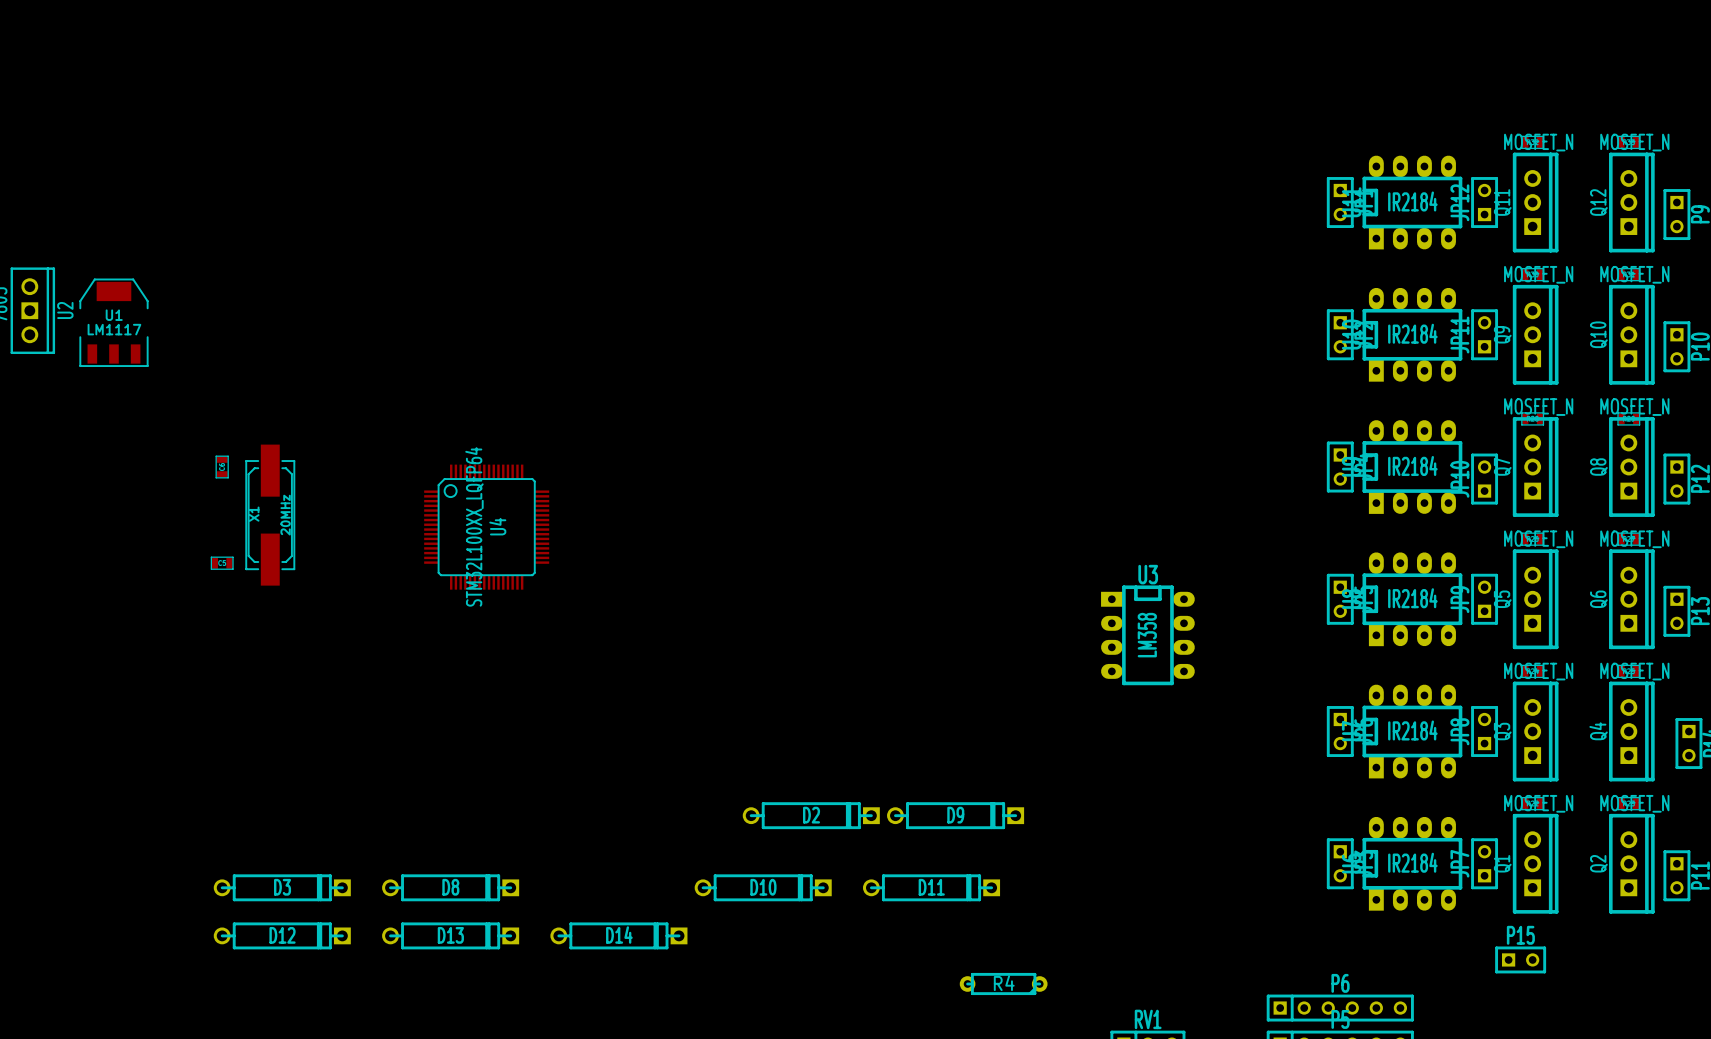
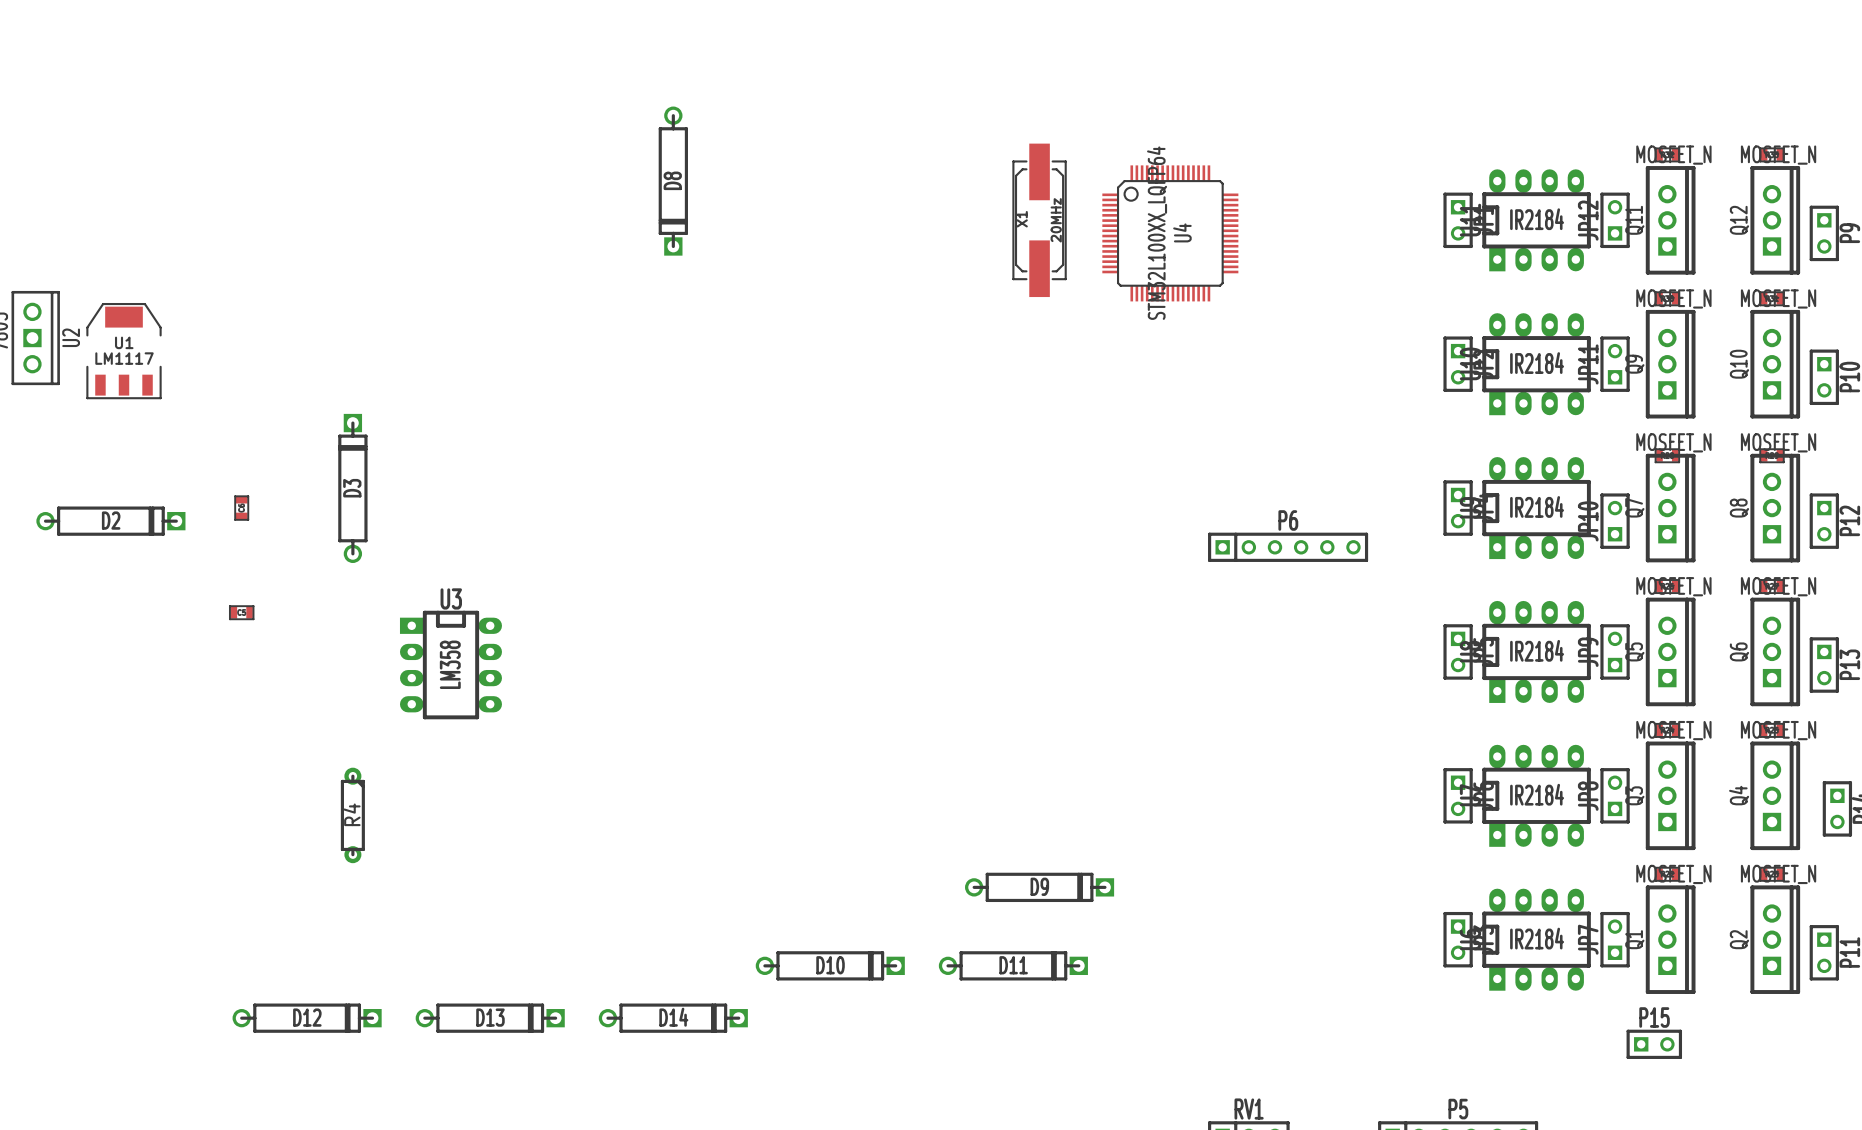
X1 position: (270, 515) -> (1039, 220)
U4 position: (486, 527) -> (1170, 233)
U3 position: (1147, 635) -> (450, 665)
D2 position: (811, 815) -> (110, 521)
D3 rotation: 0° (282, 887) -> 90° counterclockwise (352, 488)
D3 position: (282, 887) -> (352, 488)
D8 rotation: 0° (450, 887) -> 90° clockwise (673, 181)
D8 position: (450, 887) -> (673, 181)
R4 rotation: 0° (1003, 983) -> 90° counterclockwise (352, 815)
R4 position: (1003, 983) -> (352, 815)
P6 position: (1340, 1008) -> (1288, 547)

